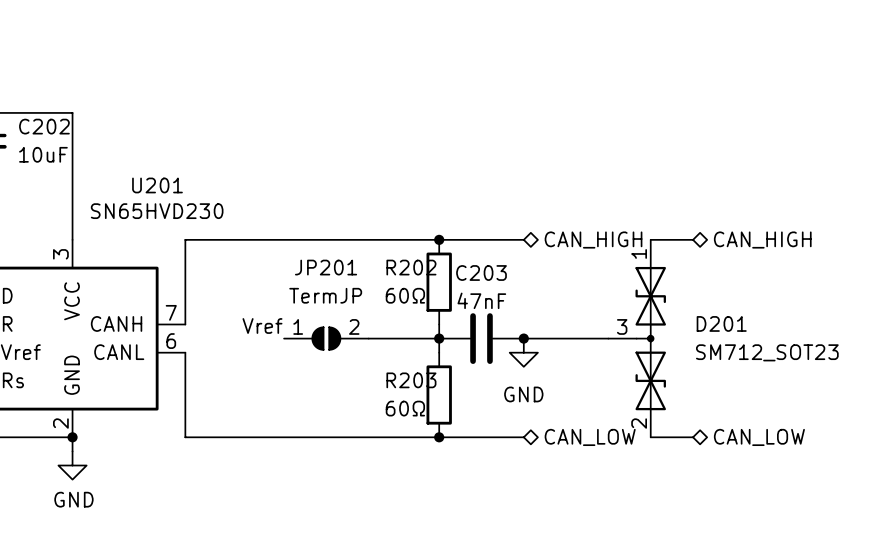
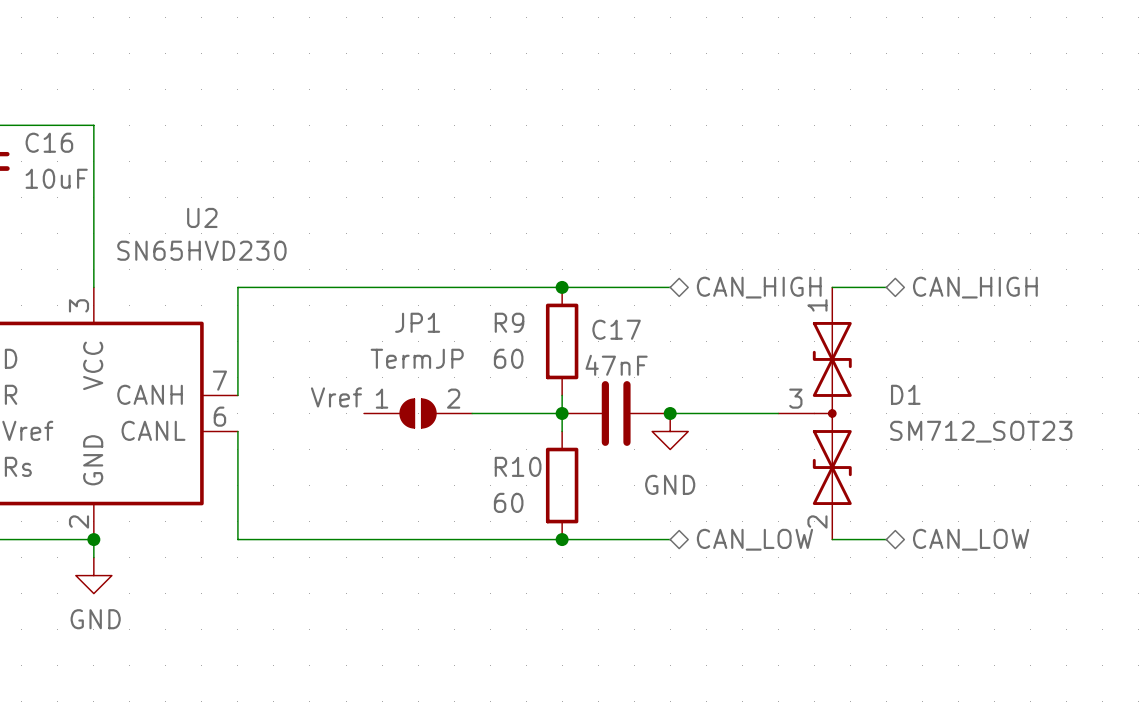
C202 name: C202 (44, 126) -> C16 (49, 142)
U201 name: U201 (157, 185) -> U2 (202, 217)
JP201 name: JP201 (326, 267) -> JP1 (417, 322)
R202 name: R202 (411, 267) -> R9 (509, 322)
C203 name: C203 (481, 273) -> C17 (616, 329)
R202 value: 60Ω (405, 295) -> 60 (508, 358)
D201 name: D201 (721, 323) -> D1 (905, 394)
R203 name: R203 (411, 380) -> R10 (518, 466)
R203 value: 60Ω (405, 408) -> 60 (508, 502)

